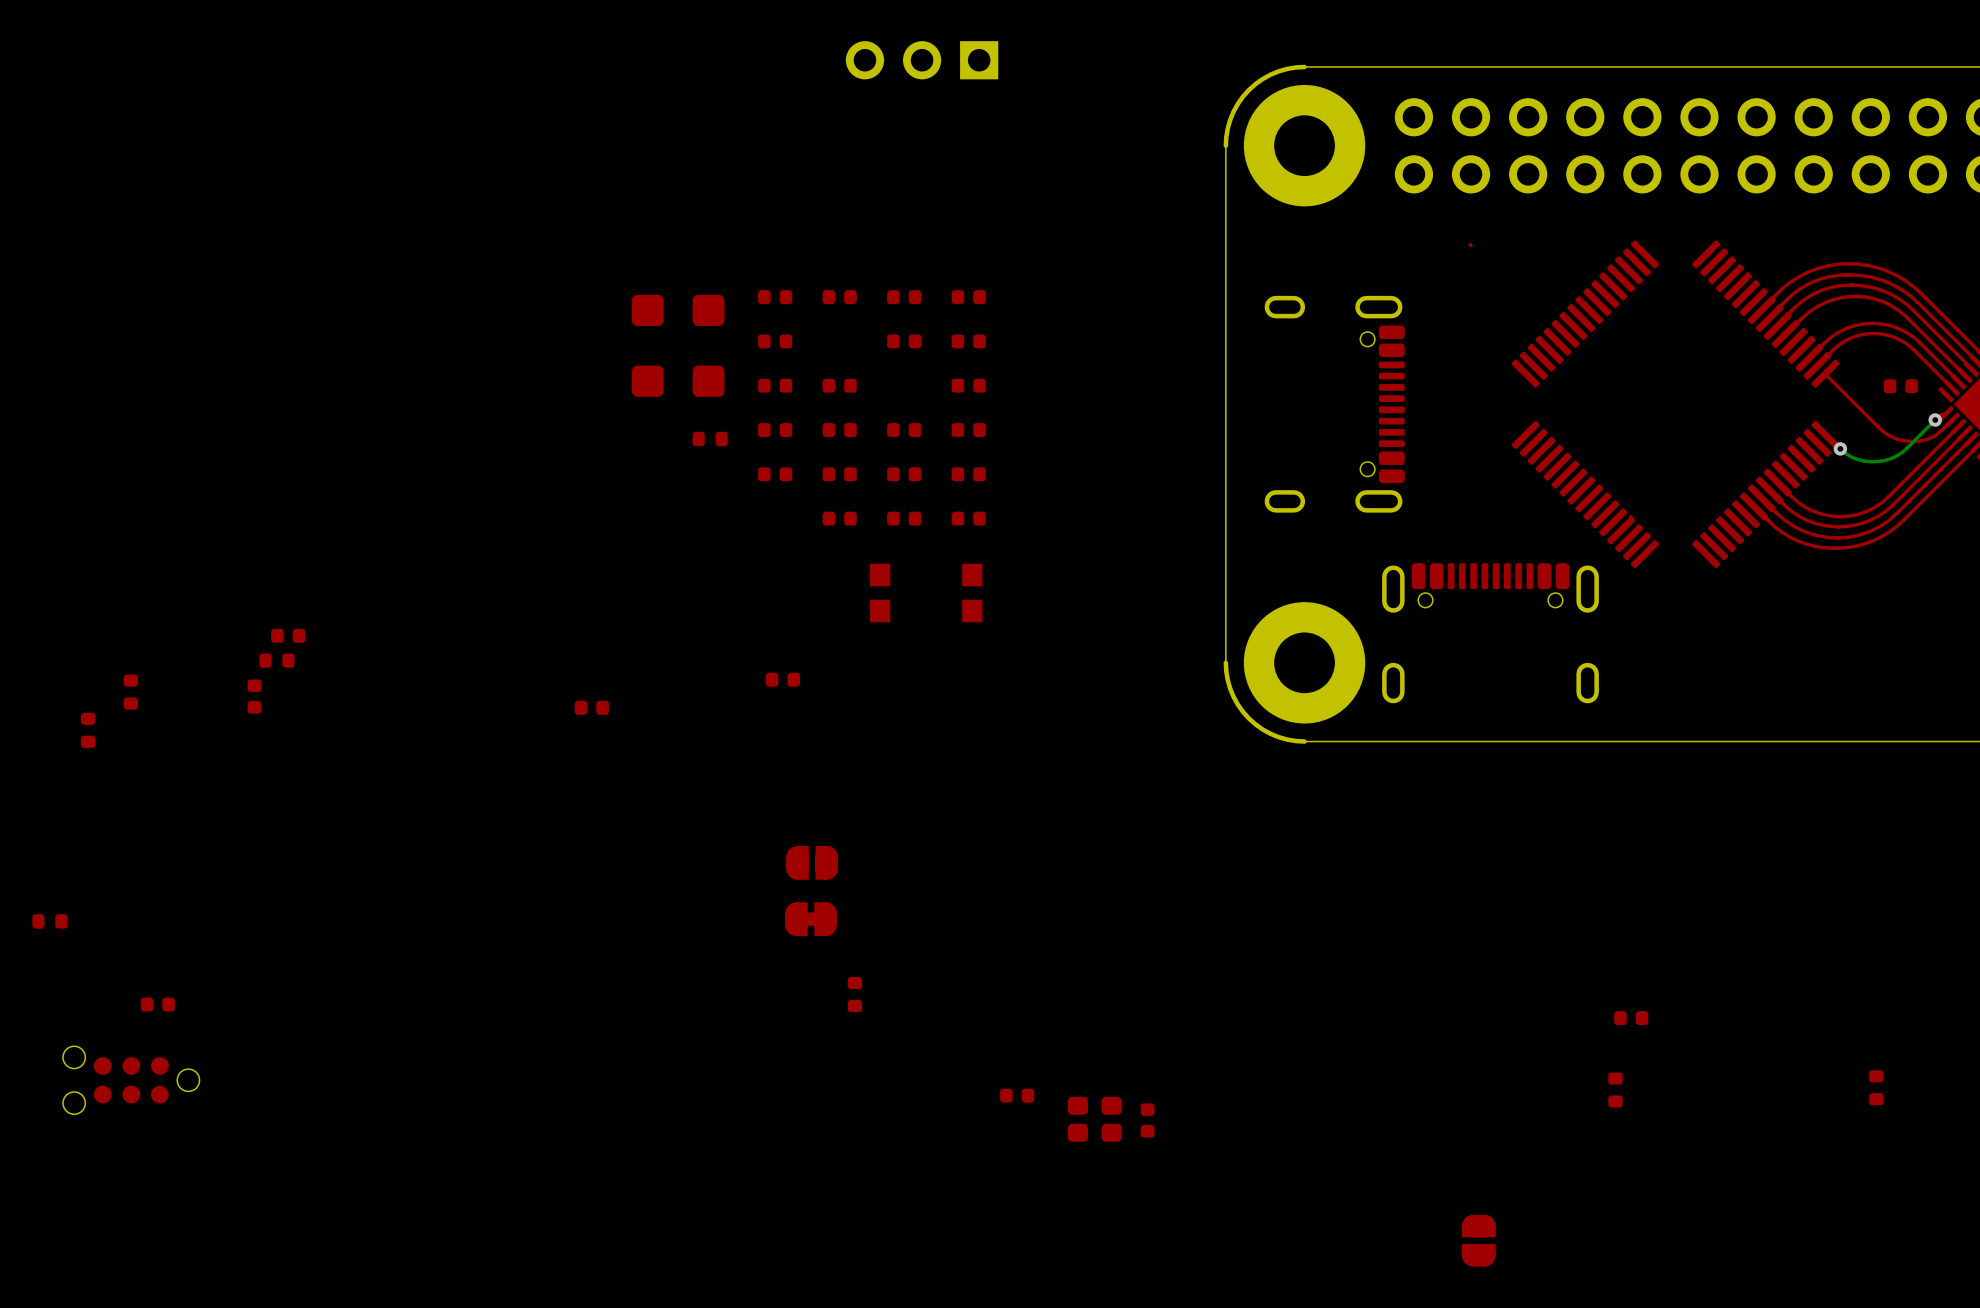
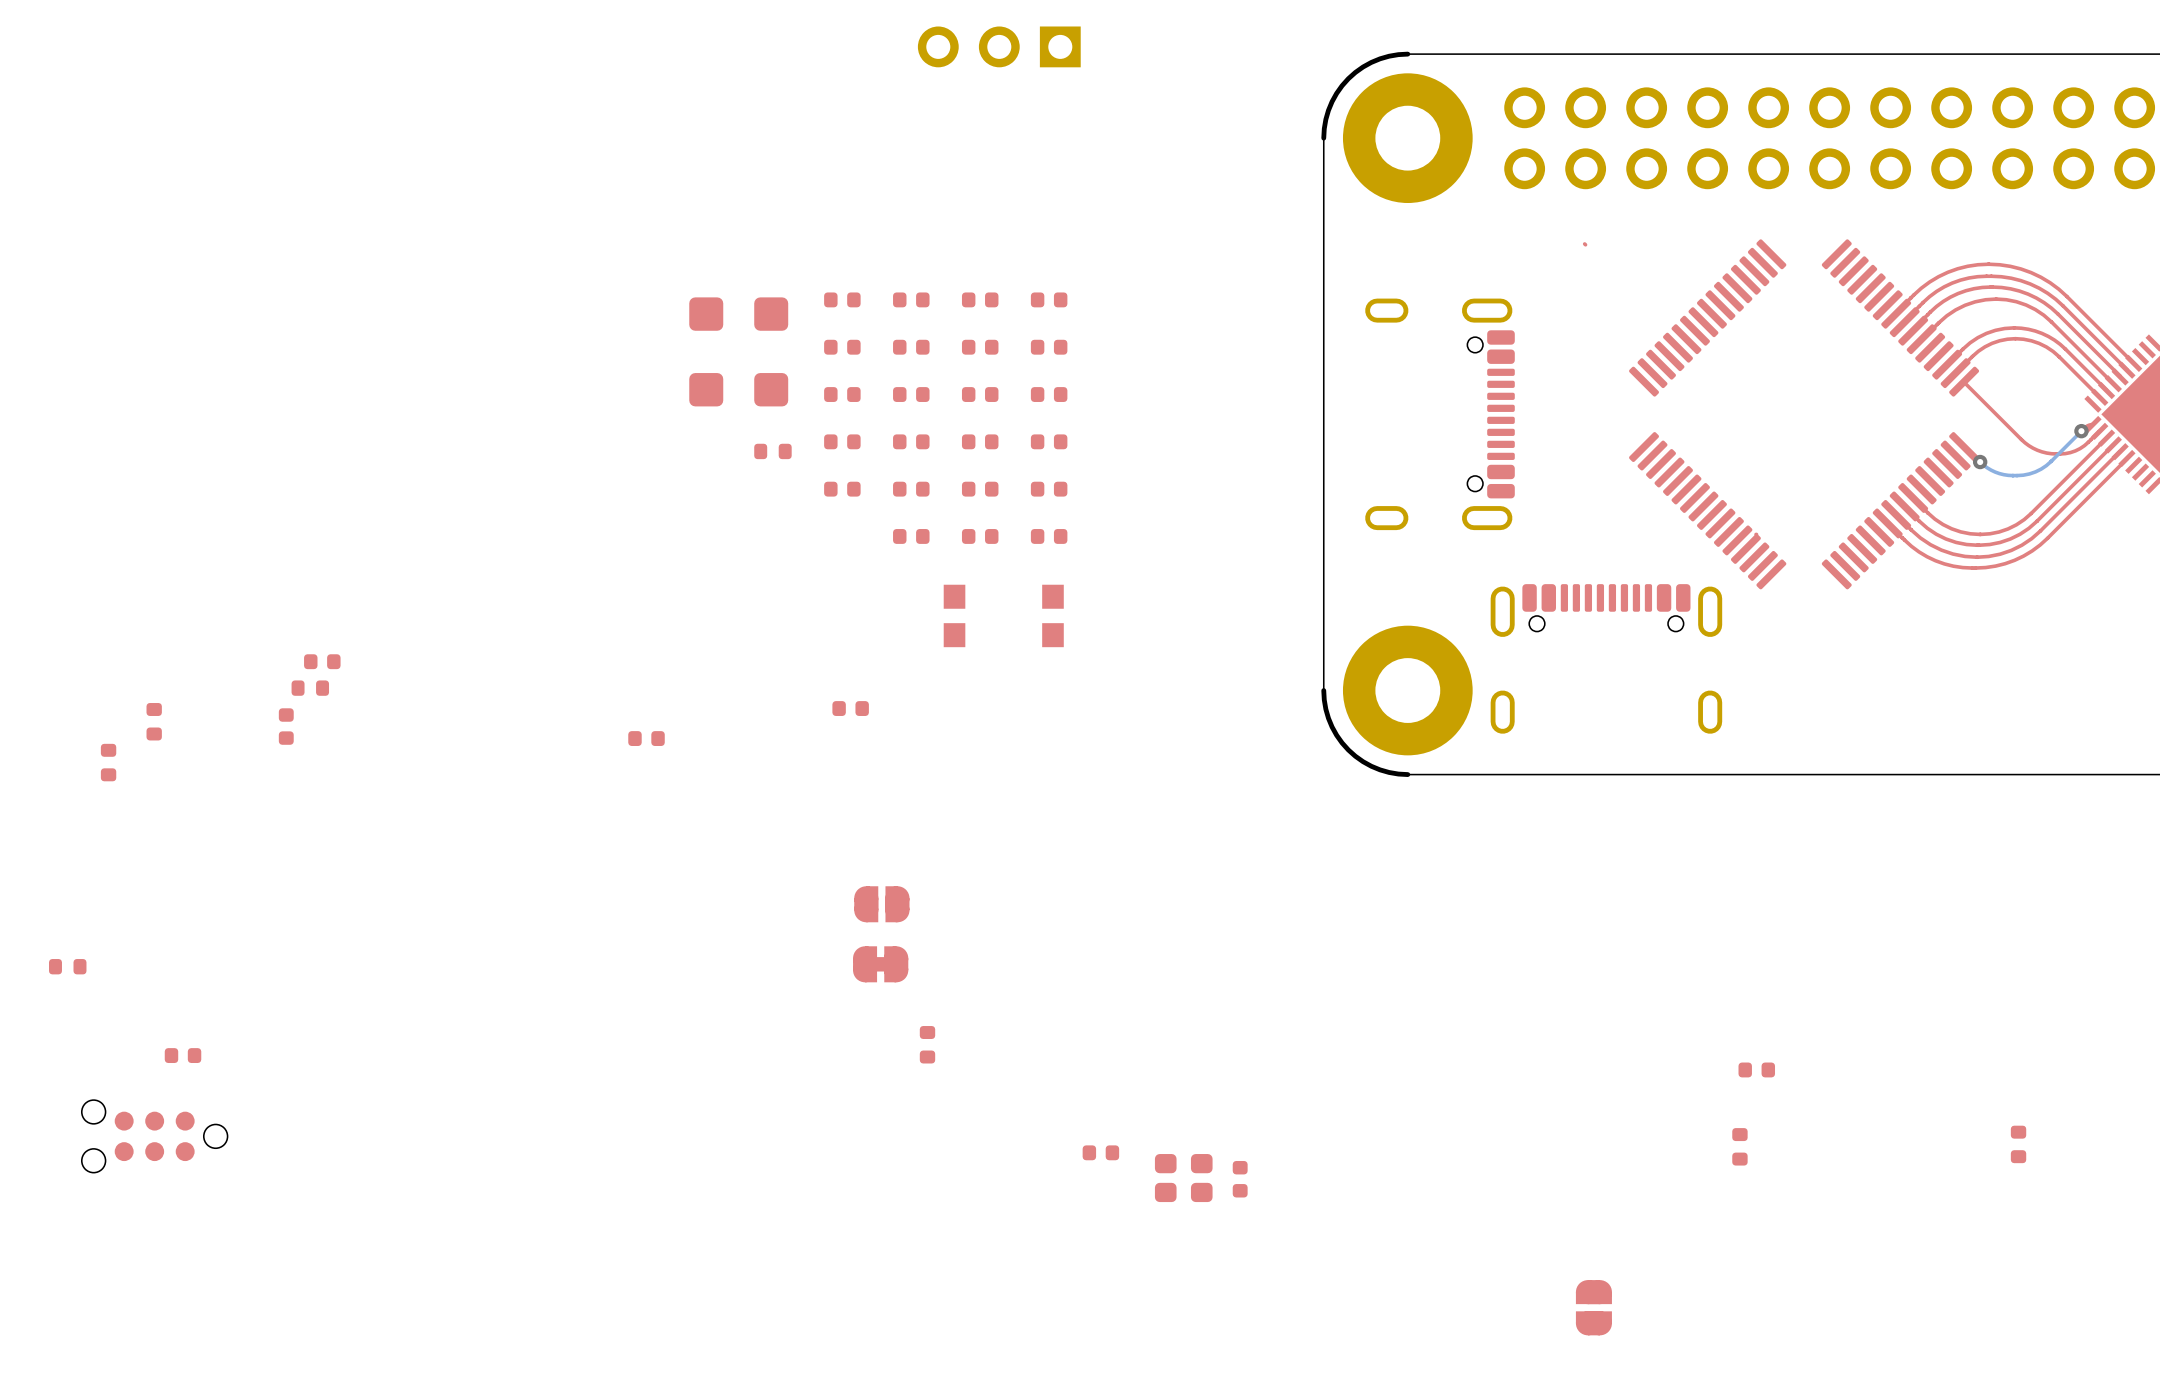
part: none -> (911, 347)
part: none -> (980, 394)
part: (1900, 386) -> none

